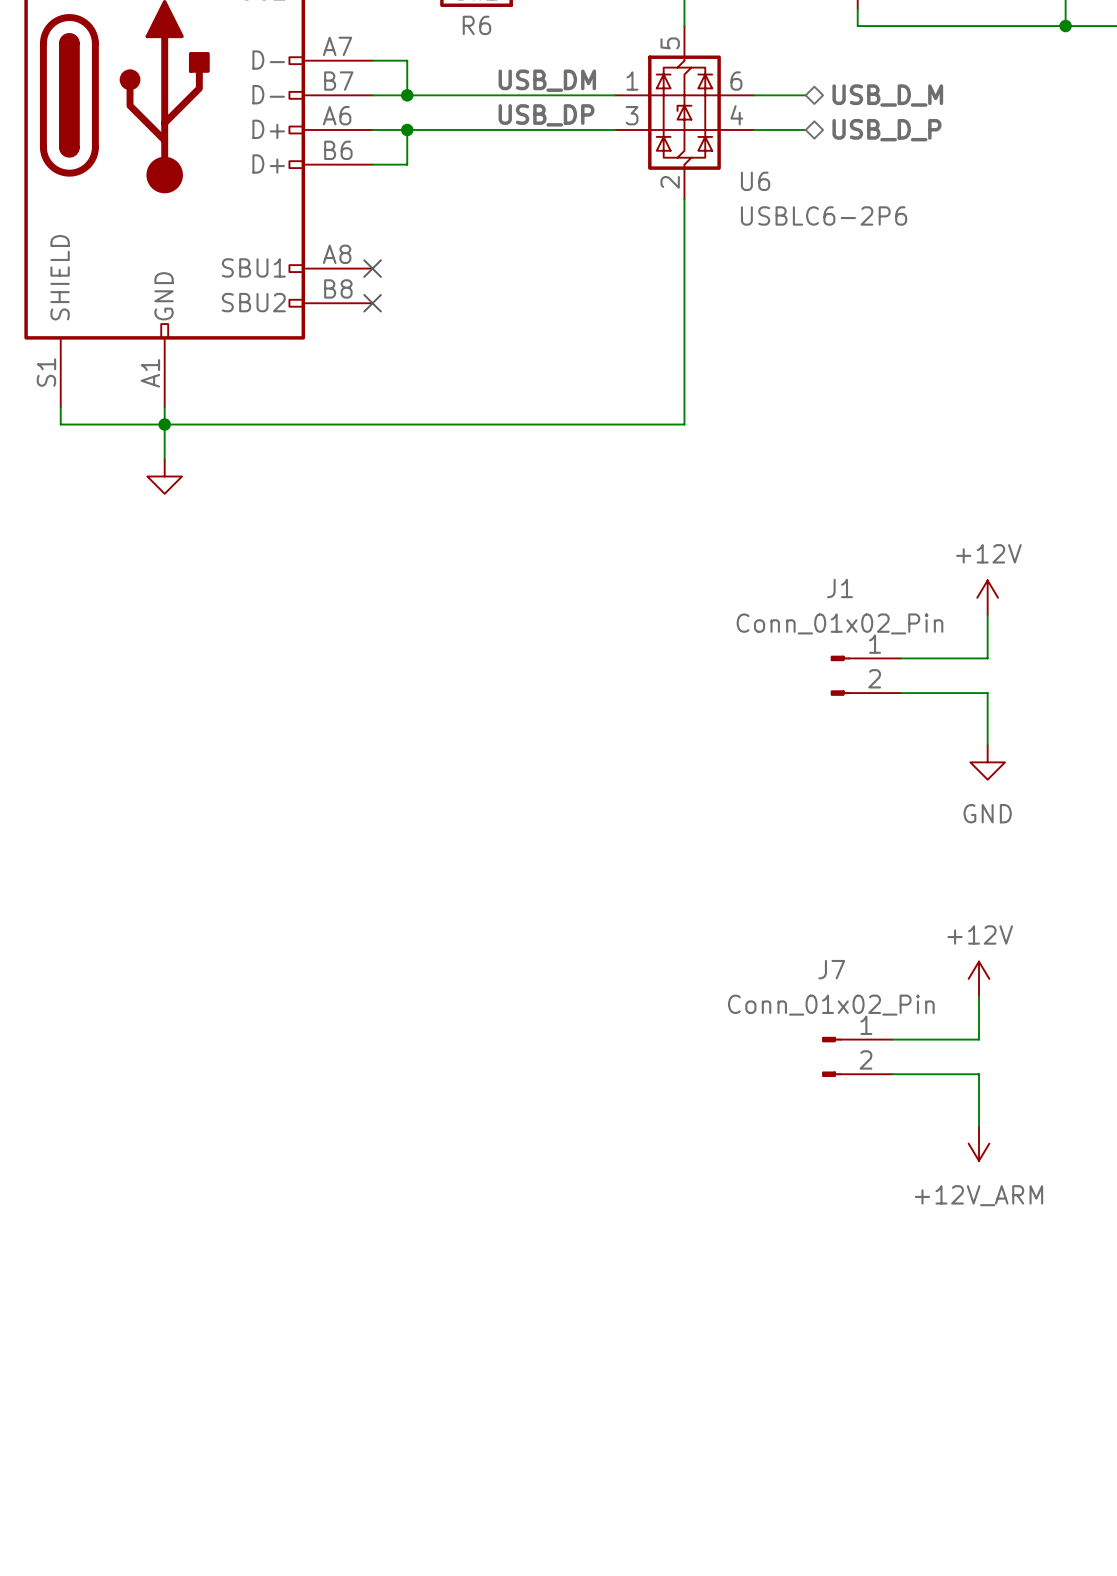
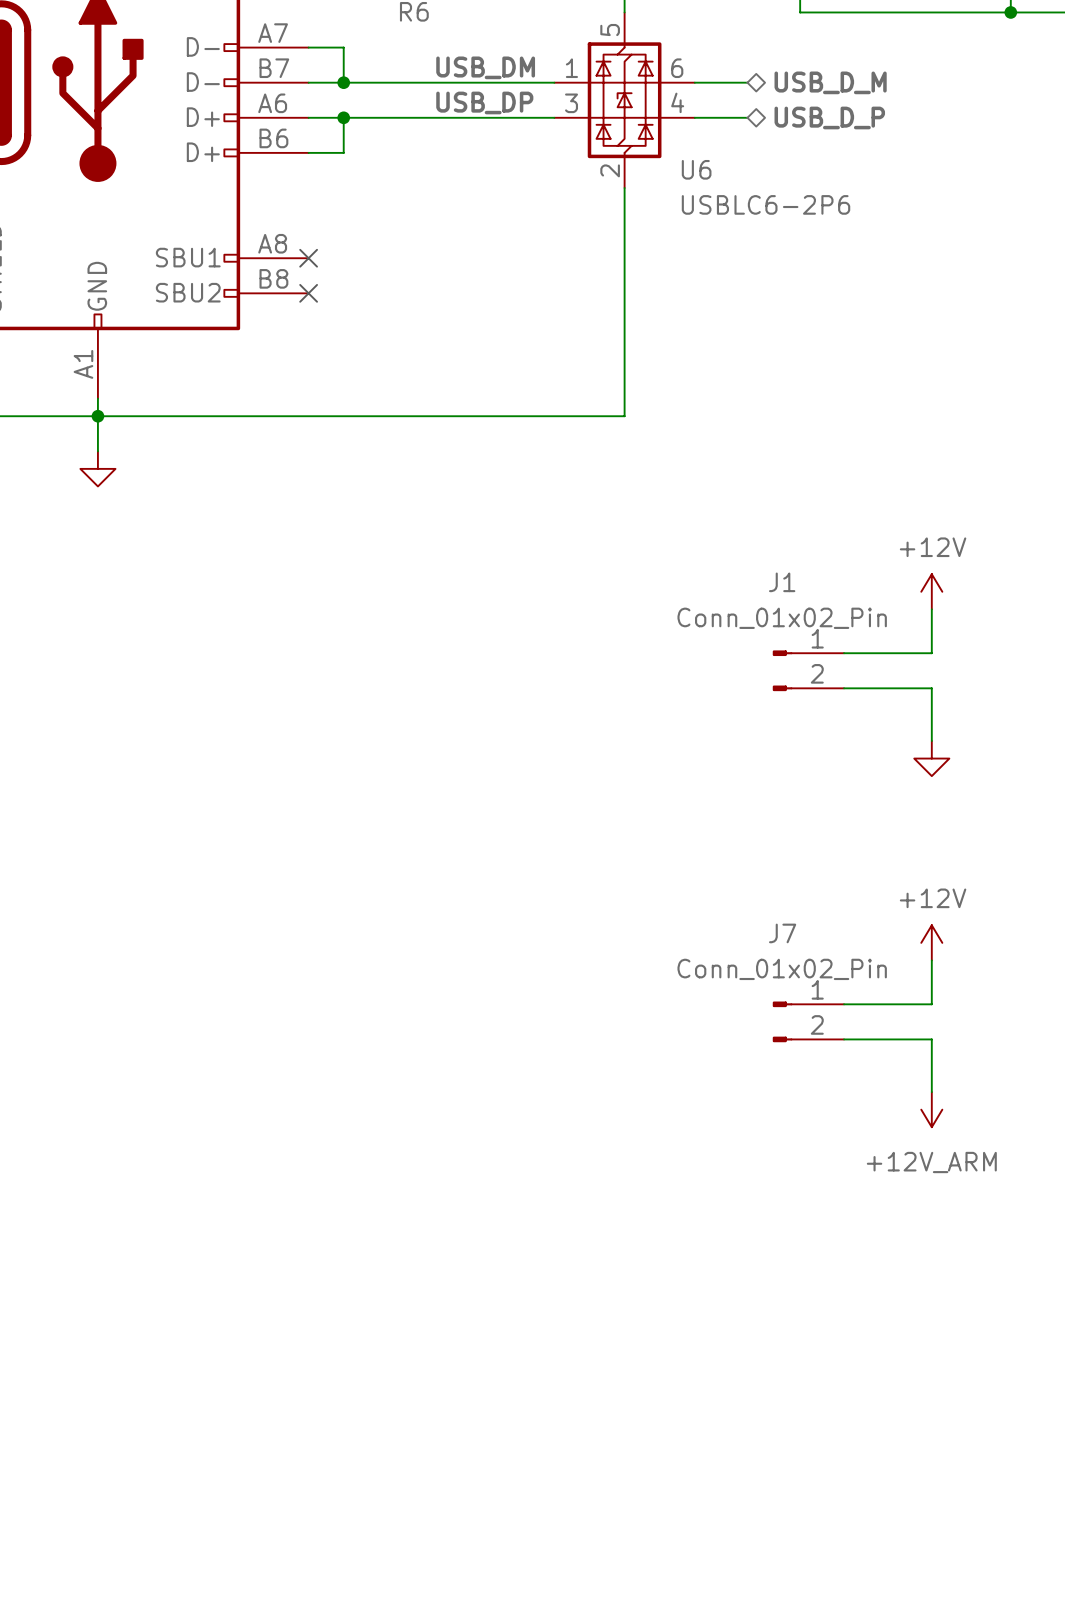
power symbol text: GND (987, 813) -> none
wire: none -> (931, 960) (931, 1004) (844, 1004)
power symbol position: +12V (979, 978) -> +12V (931, 942)
wire: (979, 996) (979, 1039) -> (931, 1092) (931, 1039) (923, 1039)
J7 position: (857, 1056) -> (808, 1021)
wire: (892, 1074) (979, 1074) (979, 1126) -> none
power symbol position: +12V_ARM (979, 1143) -> +12V_ARM (931, 1109)

